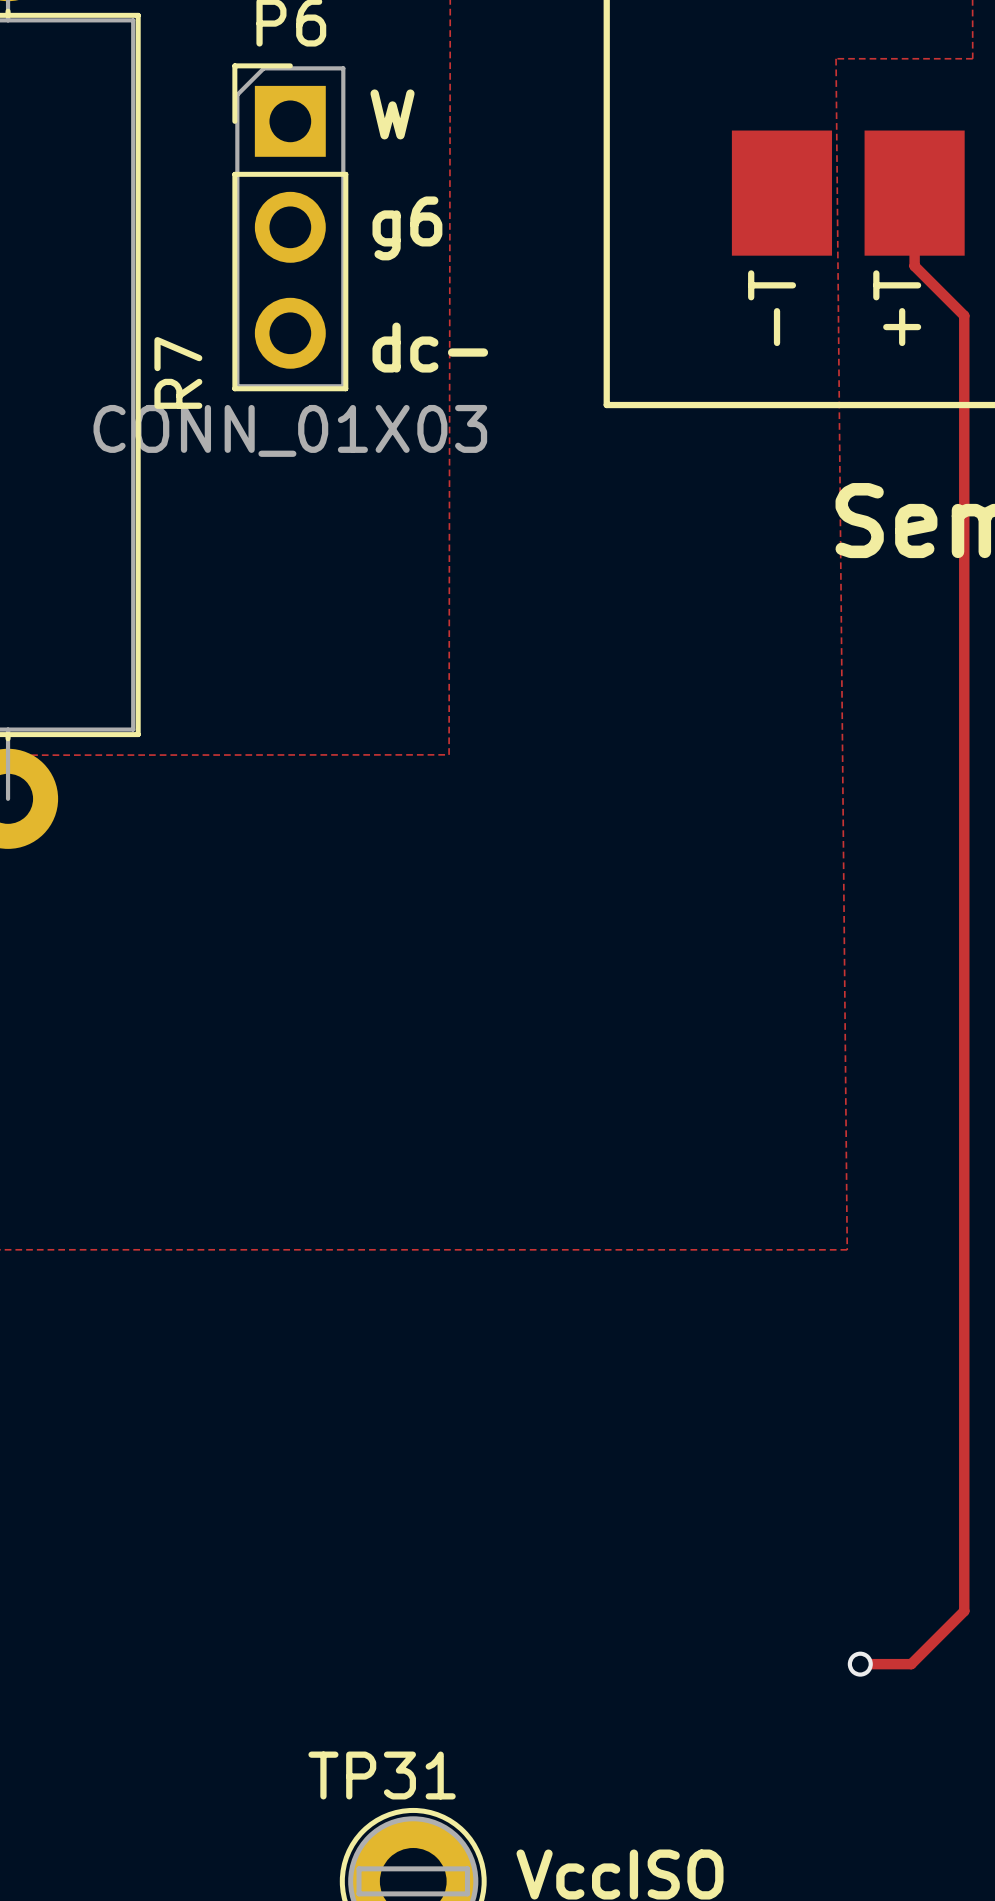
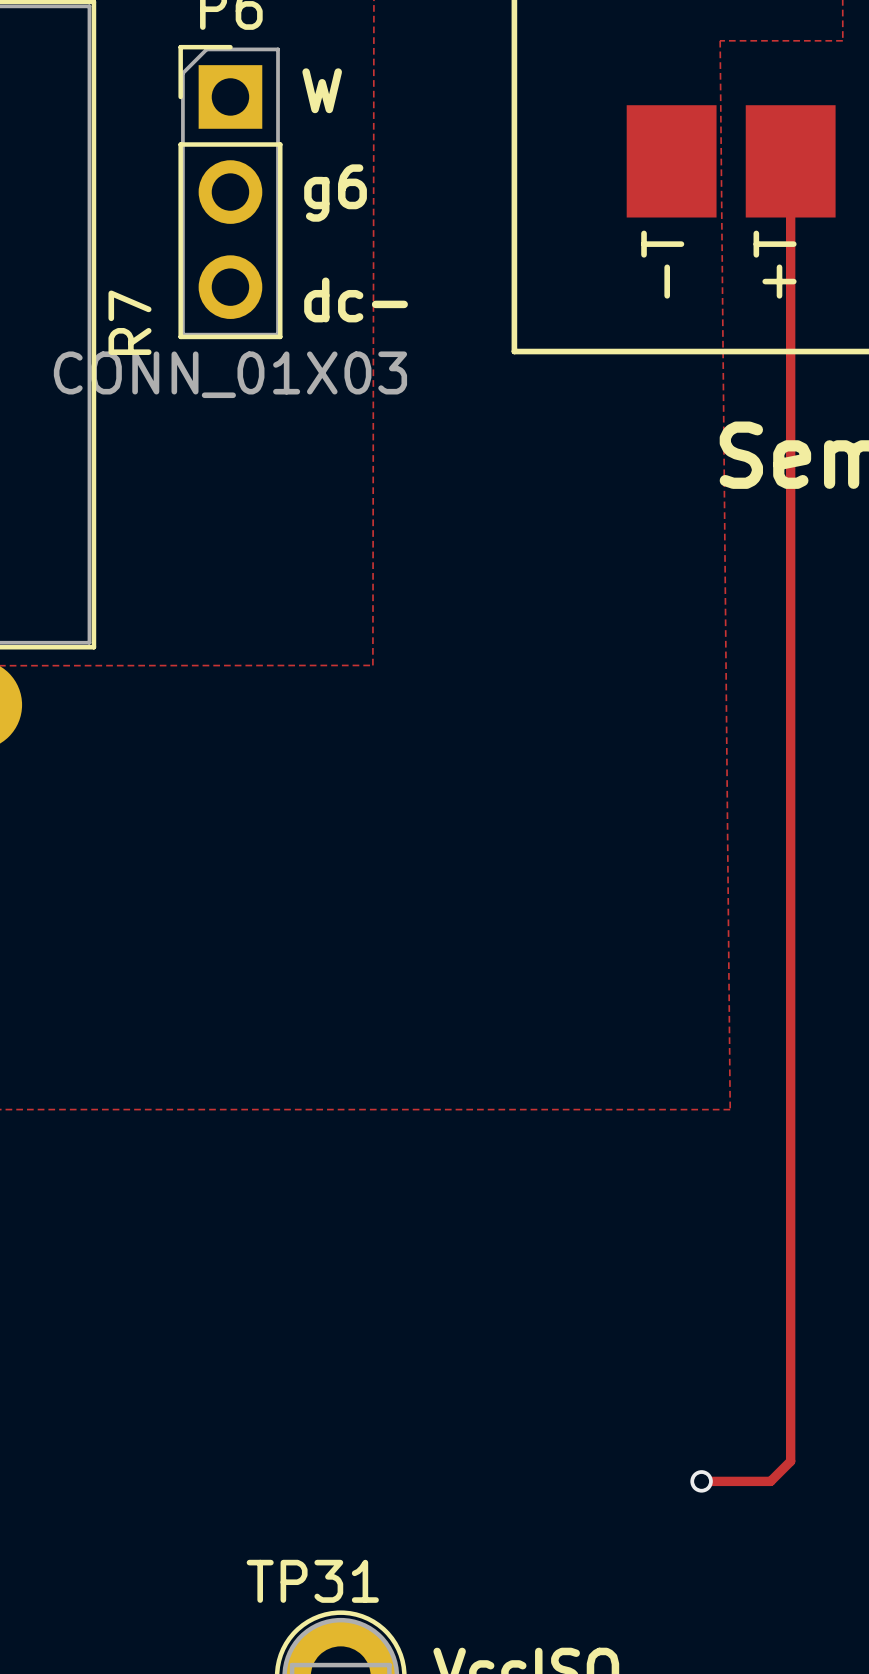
track: (914, 266) (964, 315) (964, 1611) (911, 1664) (892, 1664) -> (790, 226) (790, 1461) (770, 1481)
track: none -> (701, 1481) (741, 1481)
via position: (860, 1664) -> (701, 1481)

